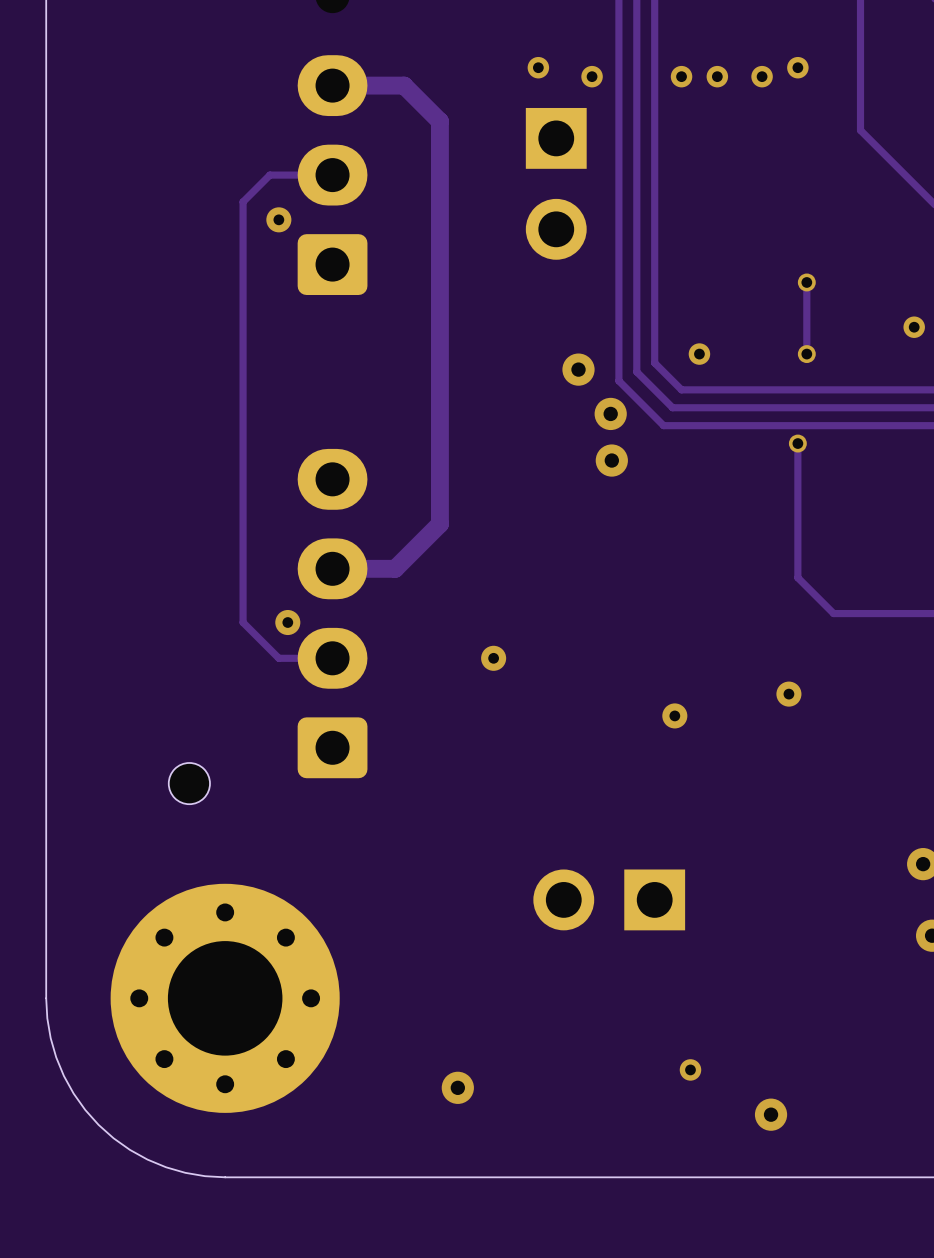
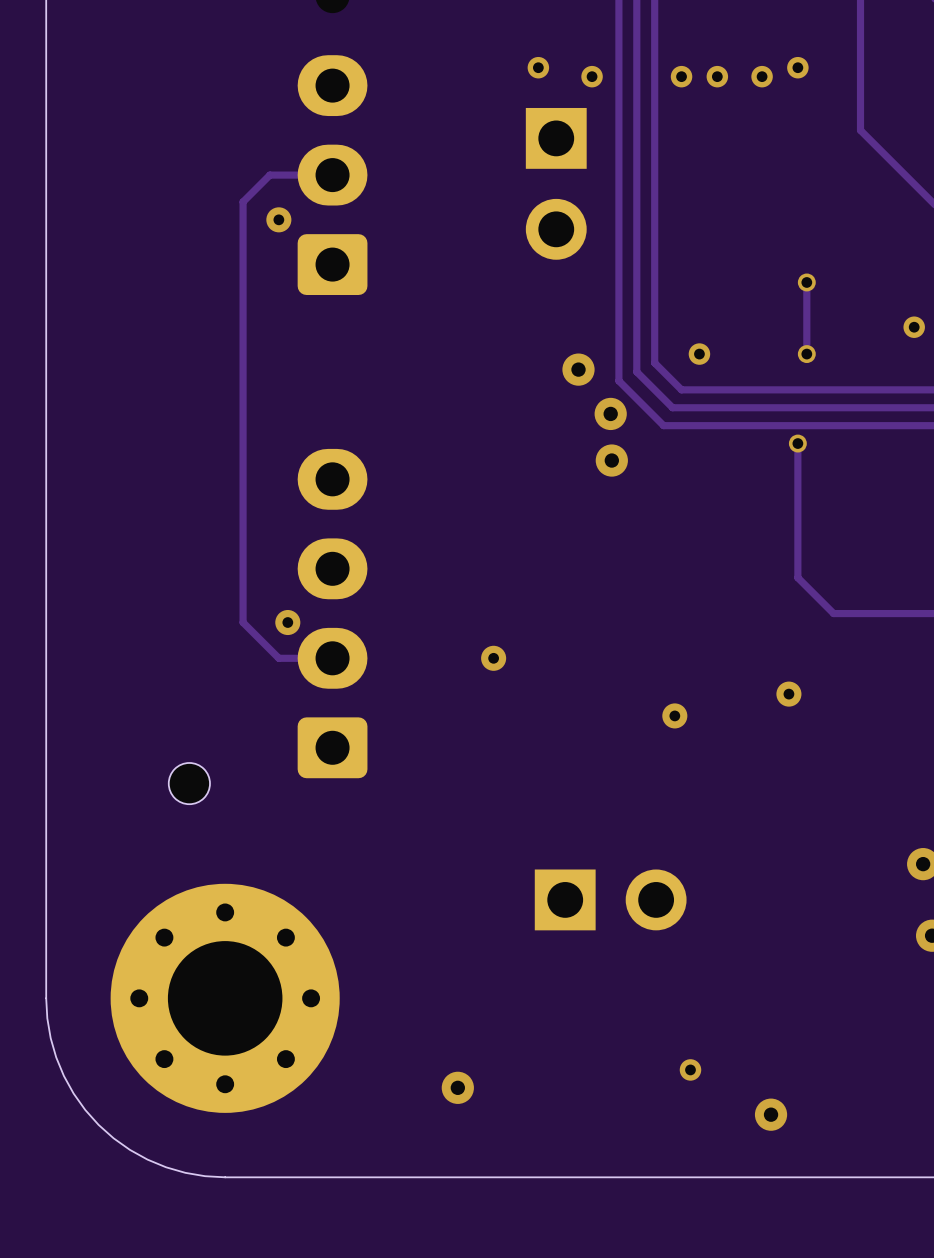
track: (332, 85) (404, 85) (439, 121) (439, 524) (395, 568) (332, 568) -> none
part rotation: 0° (609, 899) -> 180° (610, 899)

